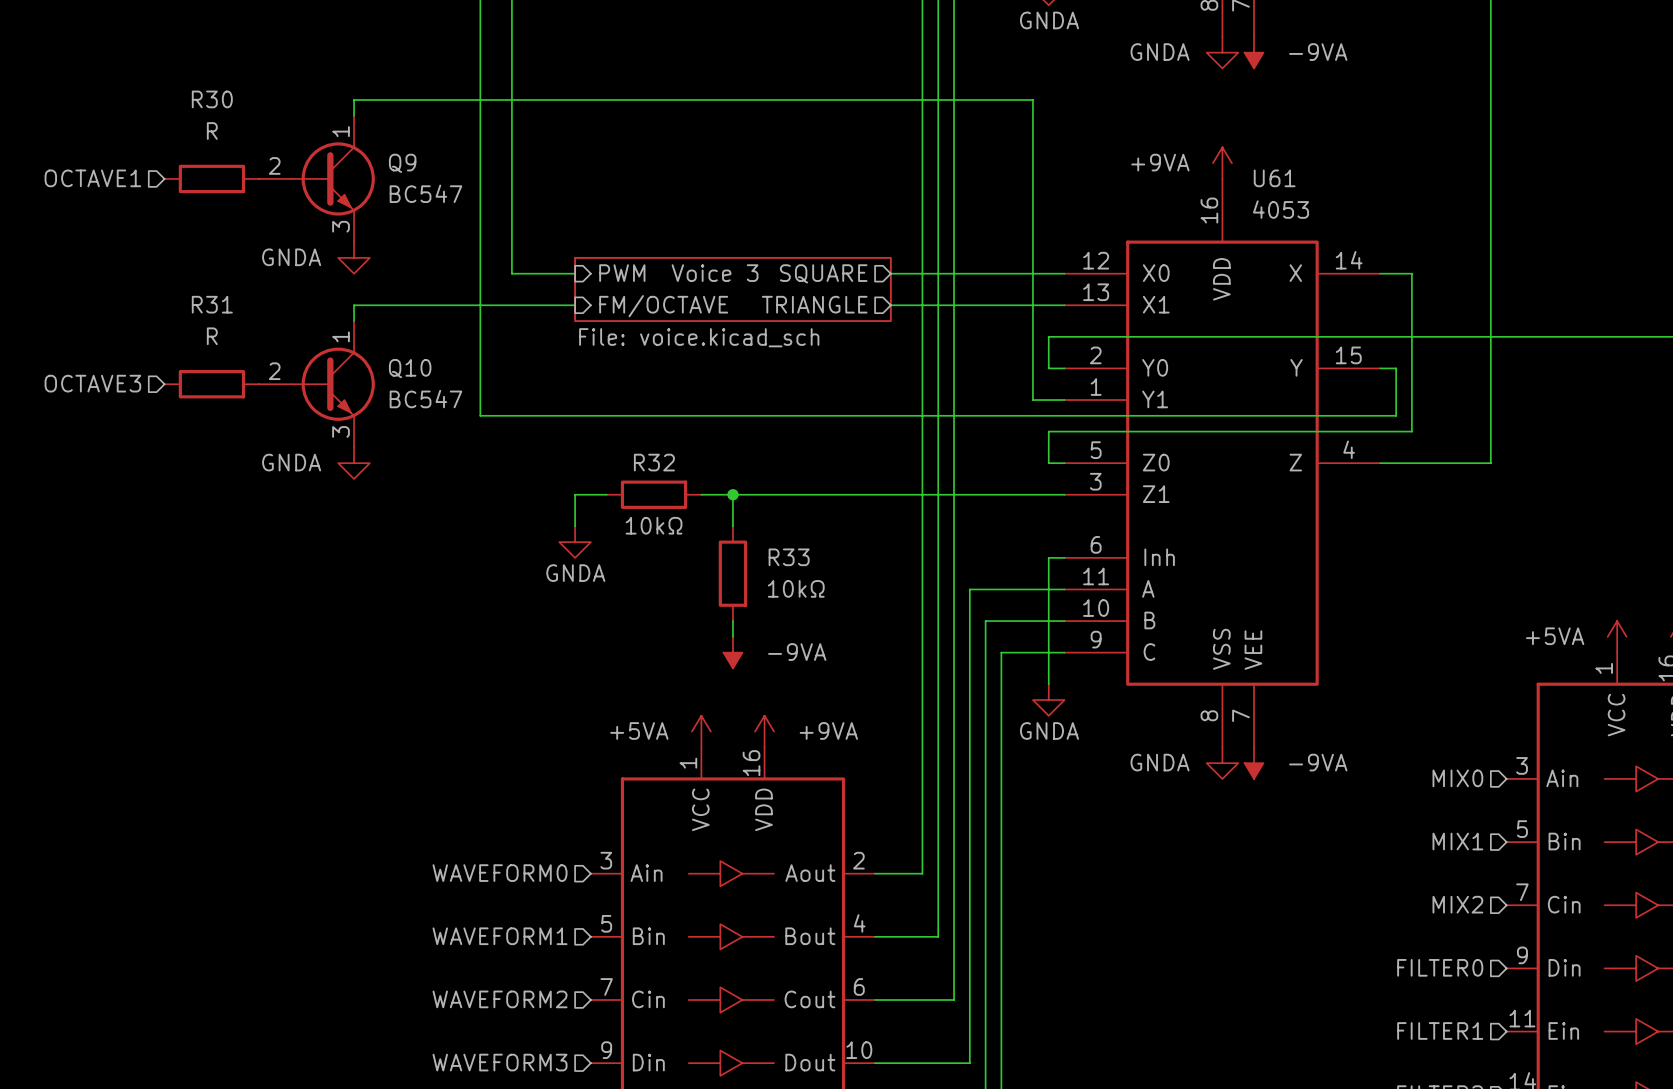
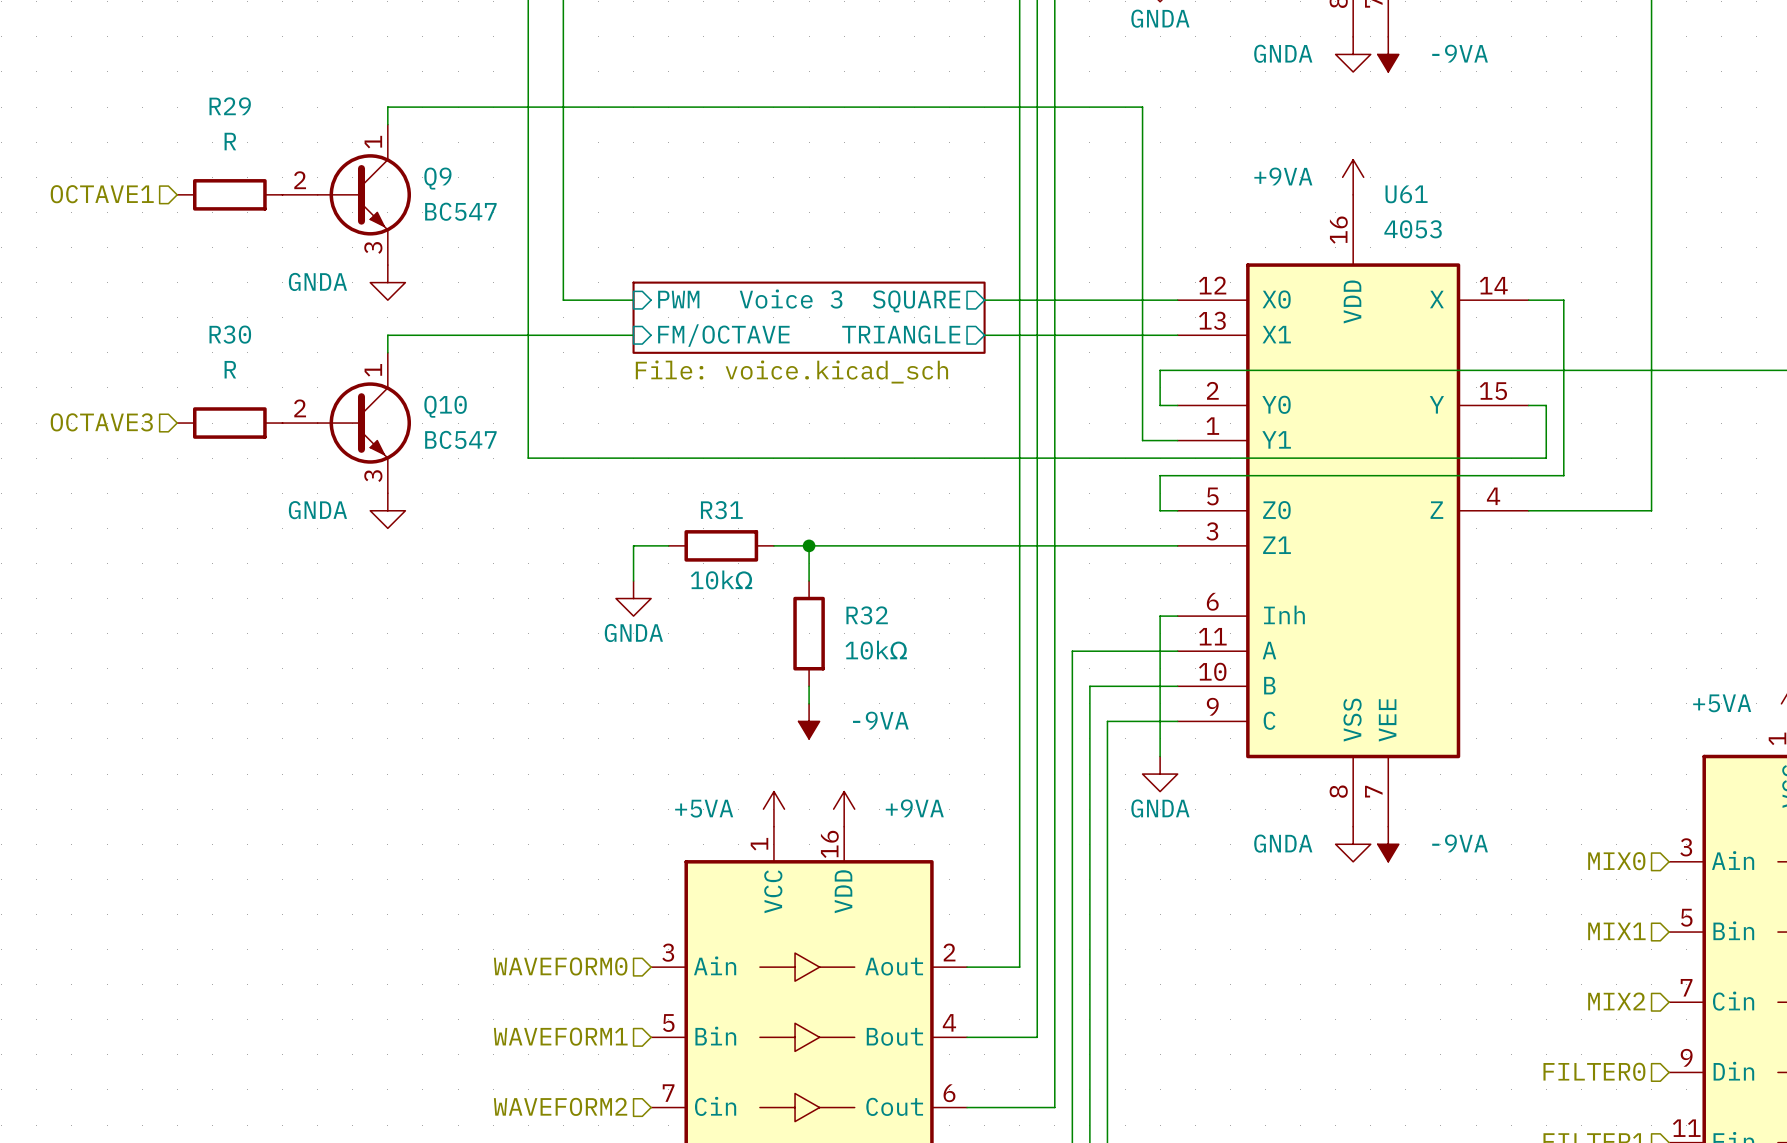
R30 name: R30 (212, 99) -> R29 (230, 106)
R31 name: R31 (212, 304) -> R30 (230, 334)
R32 name: R32 (654, 462) -> R31 (721, 510)
R33 name: R33 (789, 557) -> R32 (867, 615)

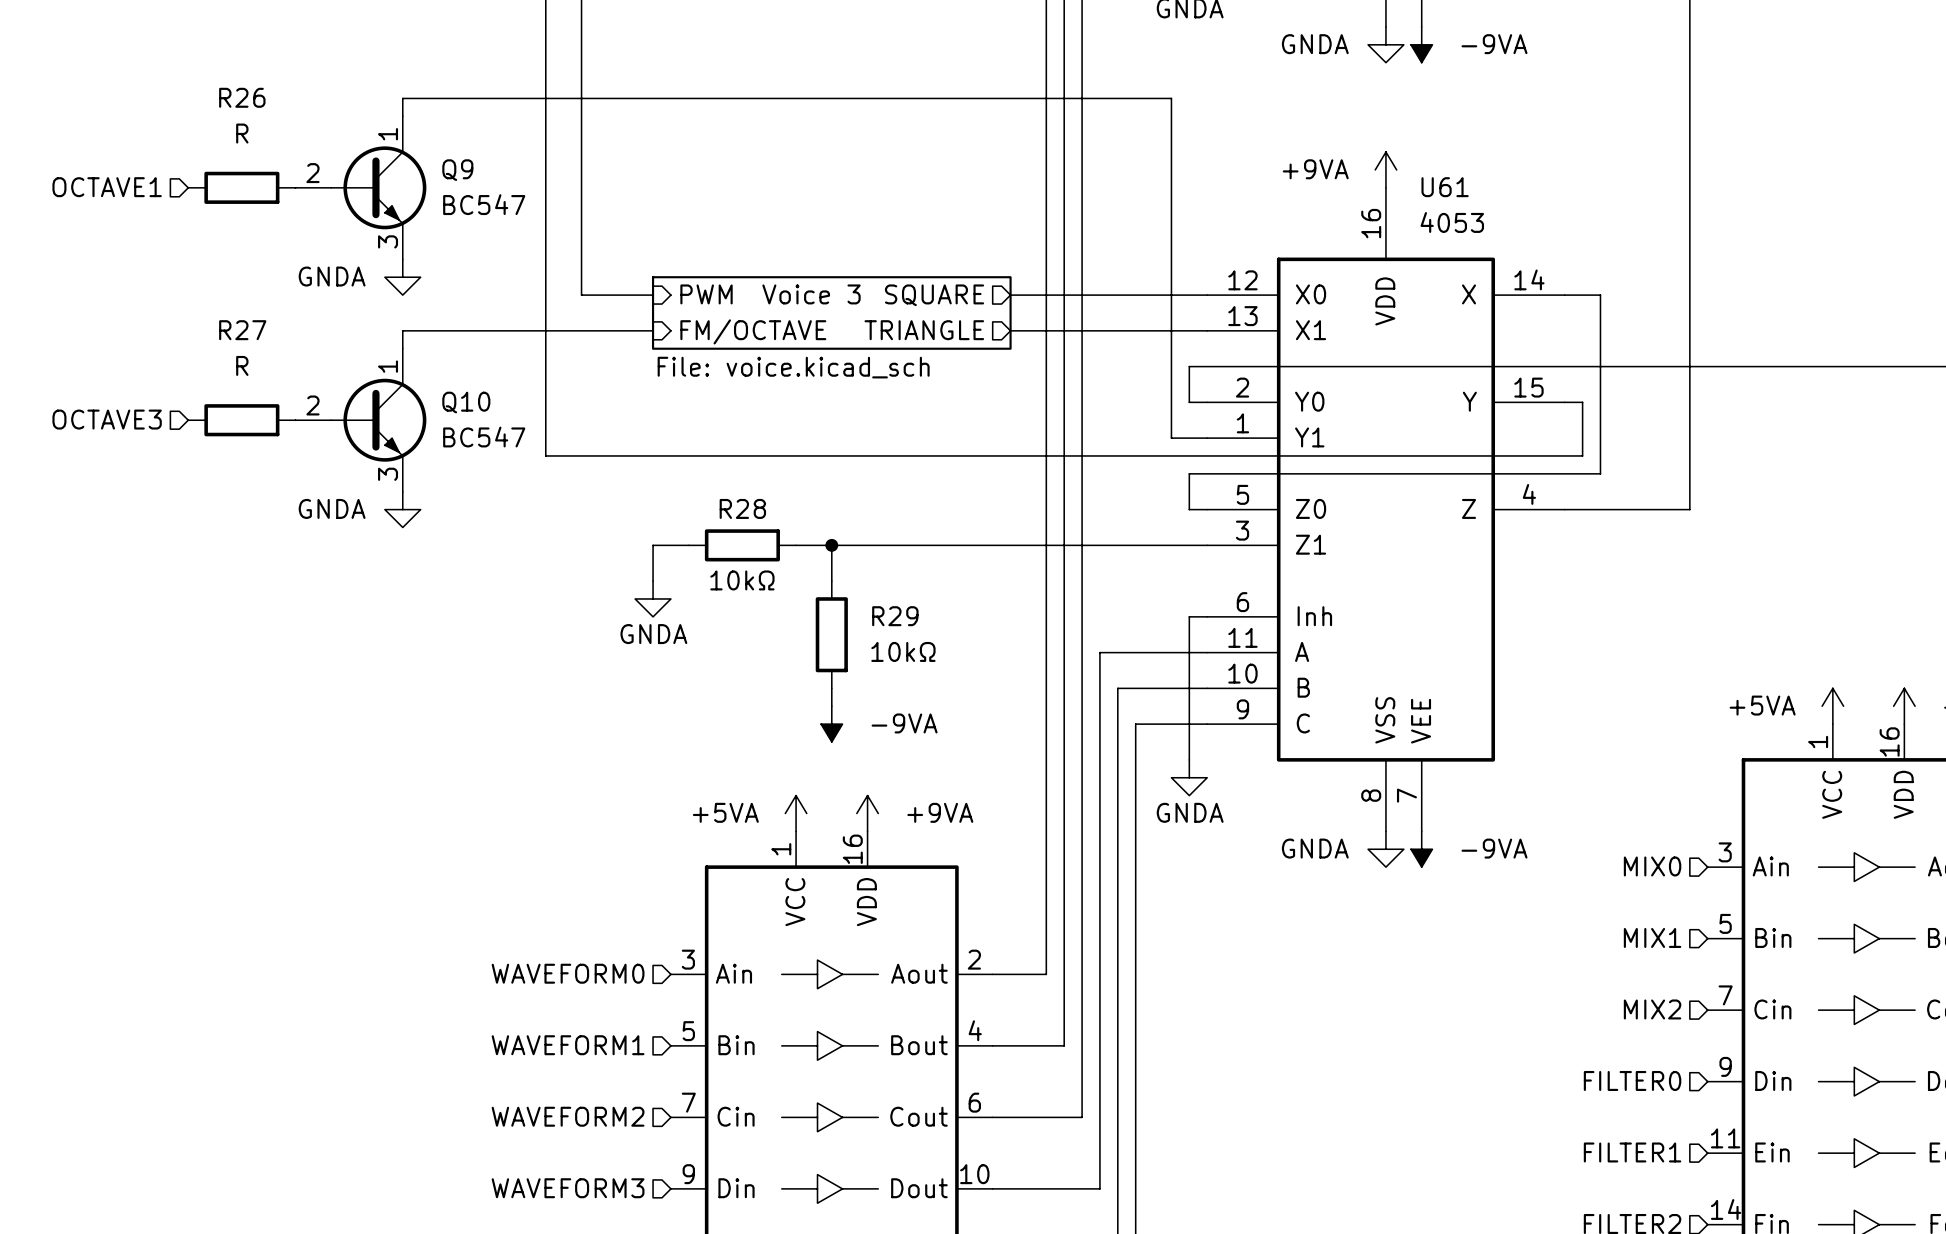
R29 name: R29 (230, 106) -> R26 (242, 97)
R30 name: R30 (230, 334) -> R27 (242, 330)
R31 name: R31 (721, 510) -> R28 (742, 508)
R32 name: R32 (867, 615) -> R29 (895, 616)

